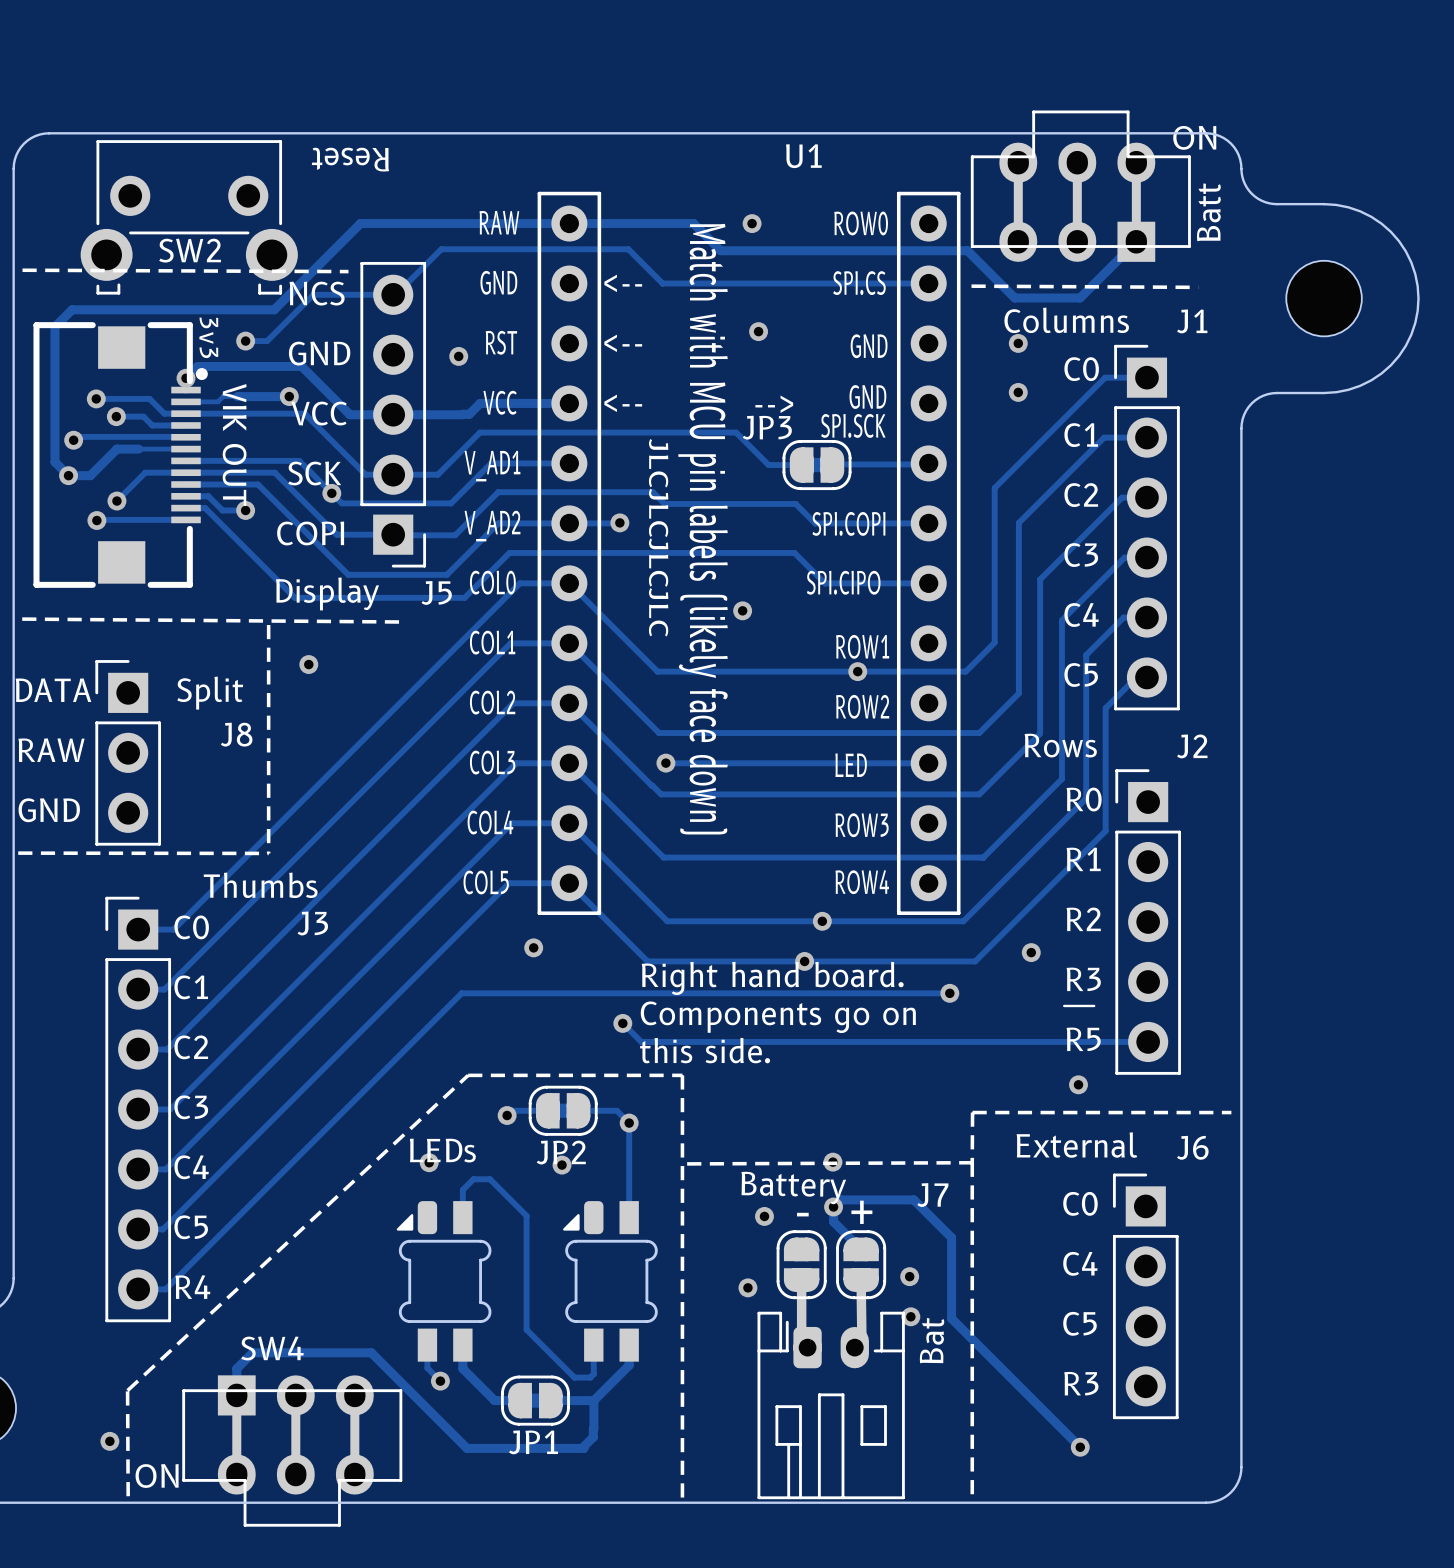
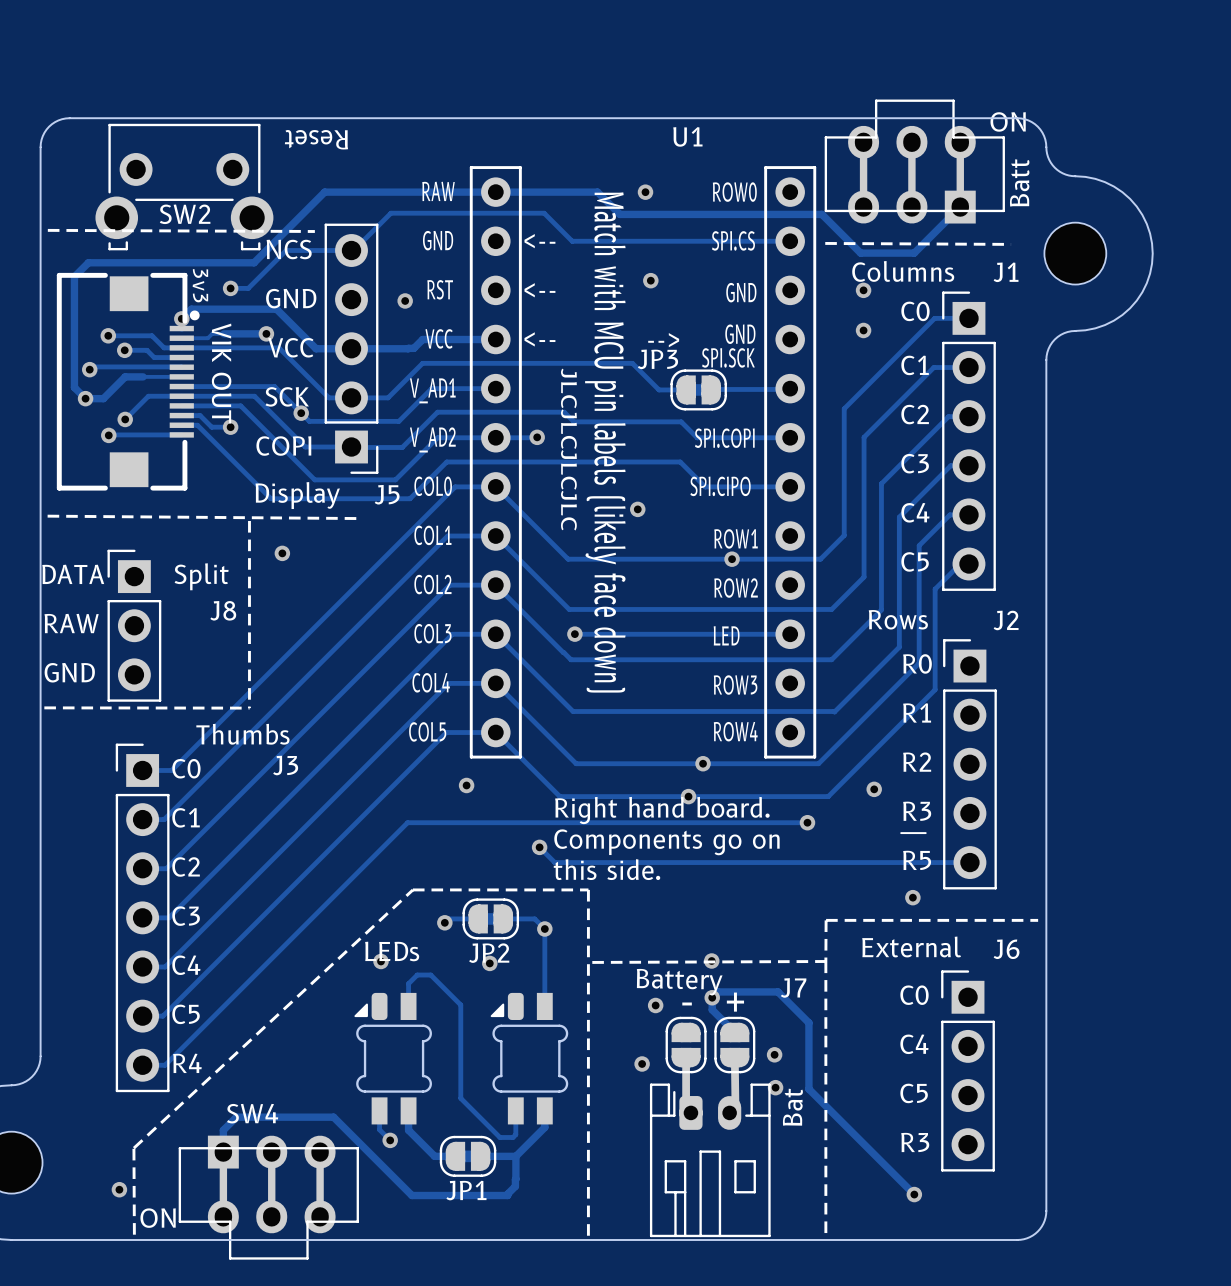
board edge: (1276, 204) (1336, 204) (1360, 211) (1371, 216) (1390, 231) (1405, 251) (1415, 274) (1418, 298) (1415, 323) (1405, 345) (1390, 365) (1371, 380) (1360, 385) (1336, 392) (1276, 393) -> (1075, 176) (1104, 182) (1130, 198) (1146, 223) (1152, 253) (1146, 283) (1130, 308) (1104, 325) (1075, 330)
part position: (1324, 298) -> (1075, 253)

